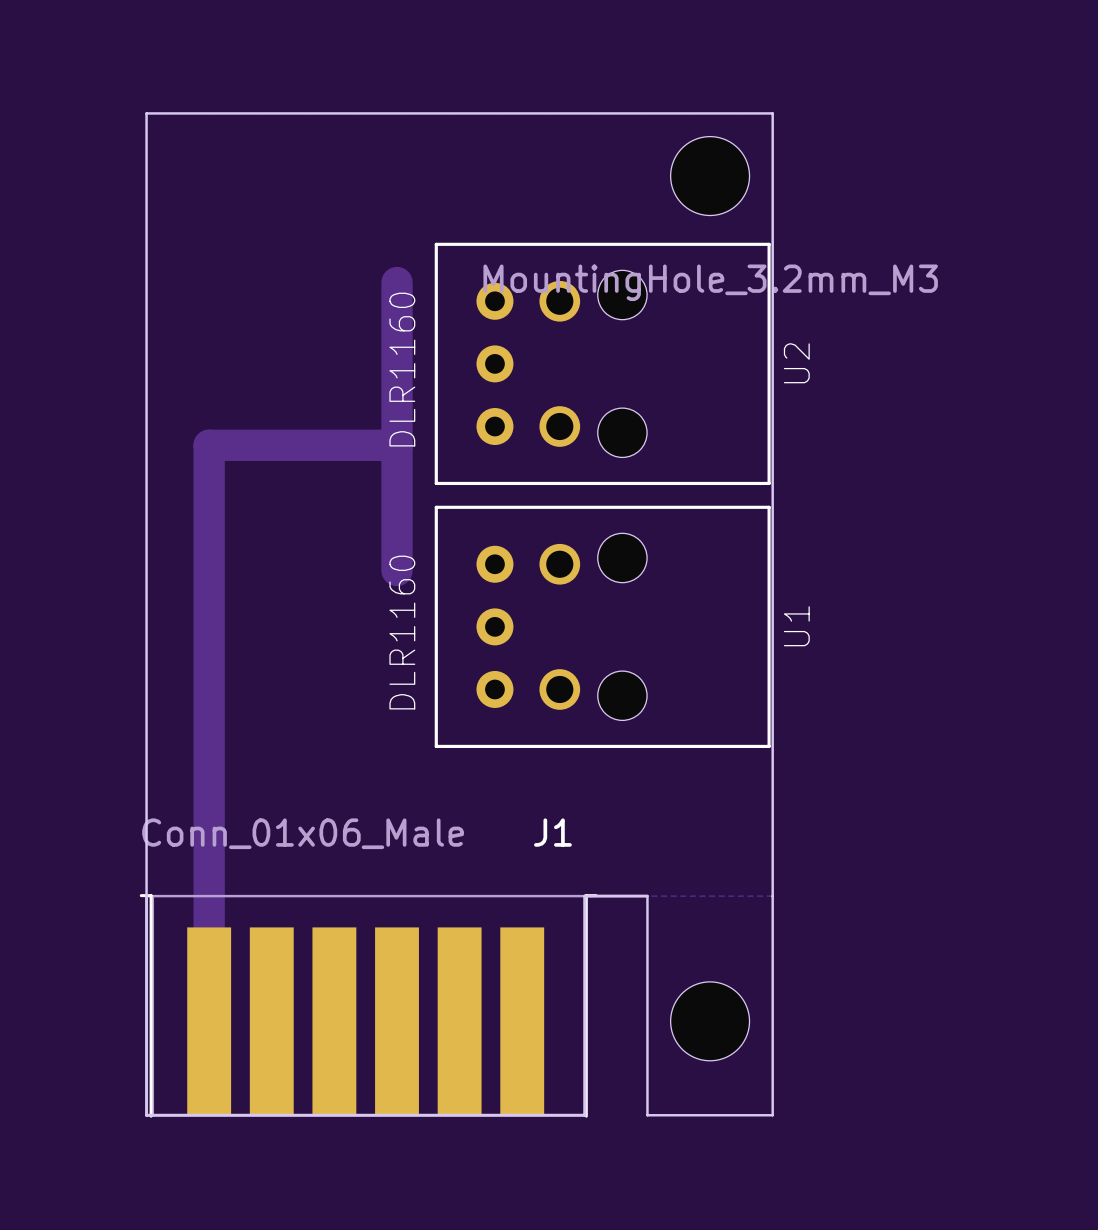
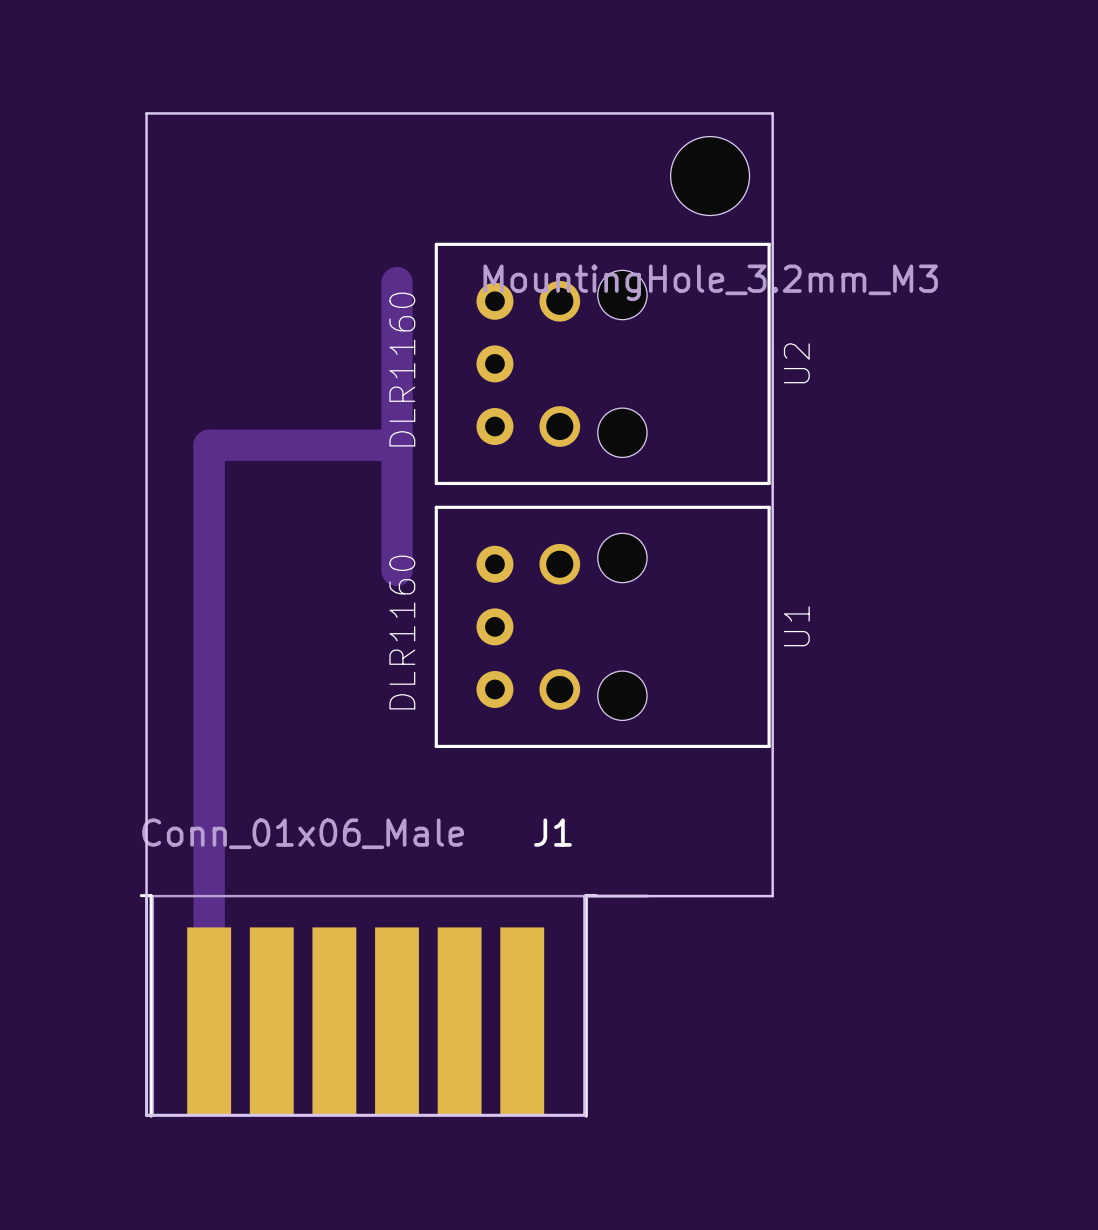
board edge: (647, 896) (647, 1115) (772, 1115) (772, 896) -> (647, 896) (772, 896)
part: (710, 1021) -> none

